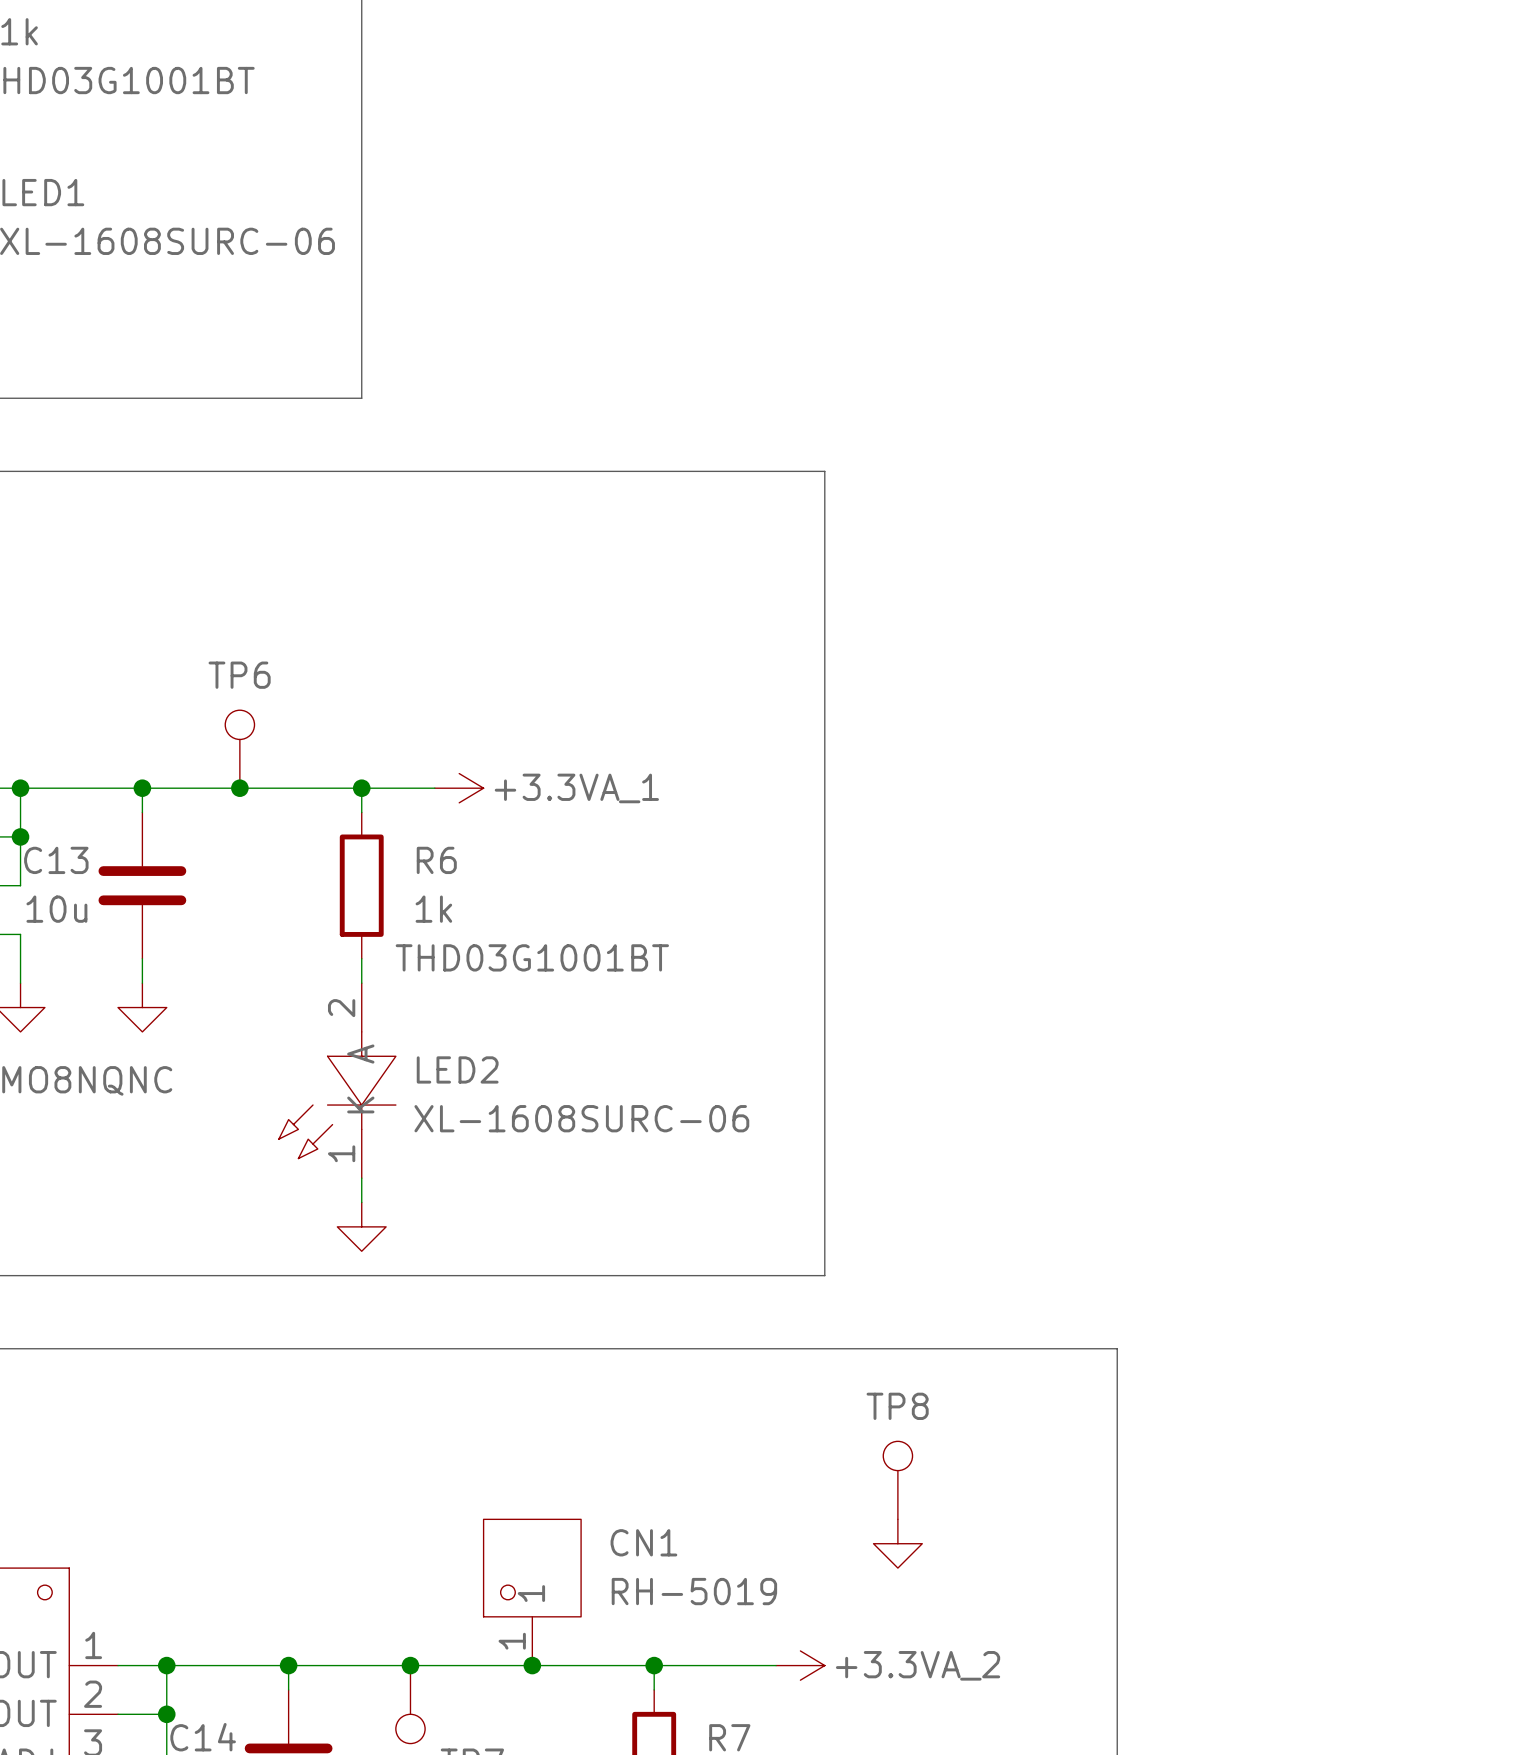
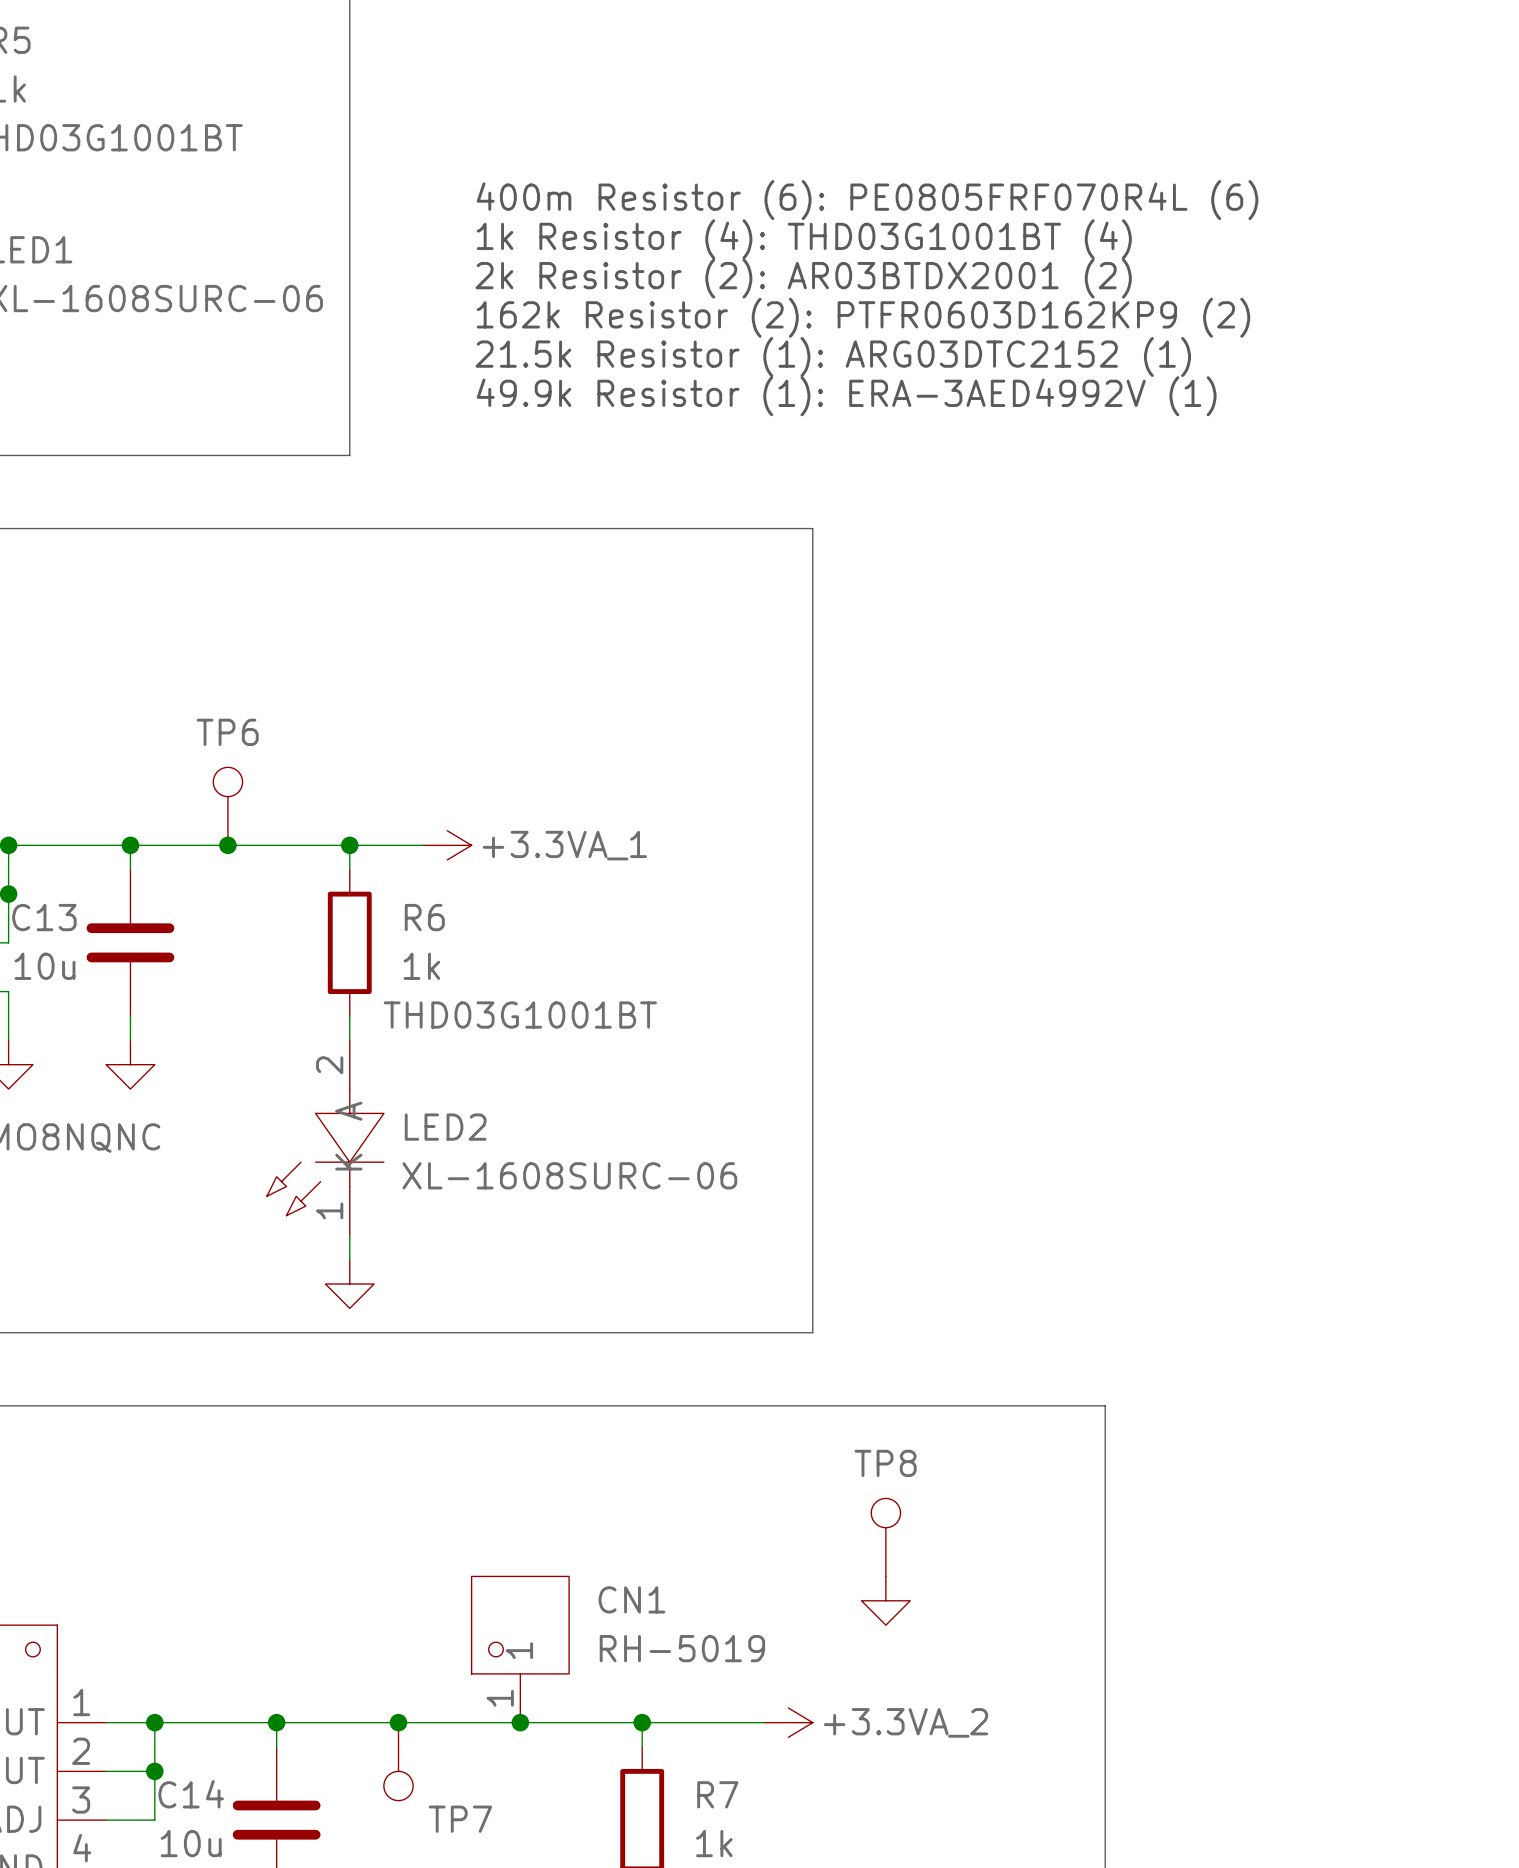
text: none -> 400m Resistor (6): PE0805FRF070R4L (6) (867, 200)
text: none -> 1k Resistor (4): THD03G1001BT (4) (804, 239)
text: none -> 2k Resistor (2): AR03BTDX2001 (2) (803, 278)
text: none -> 162k Resistor (2): PTFR0603D162KP9 (2) (863, 317)
text: none -> 21.5k Resistor (1): ARG03DTC2152 (1) (833, 356)
text: none -> 49.9k Resistor (1): ERA-3AED4992V (1) (846, 396)

